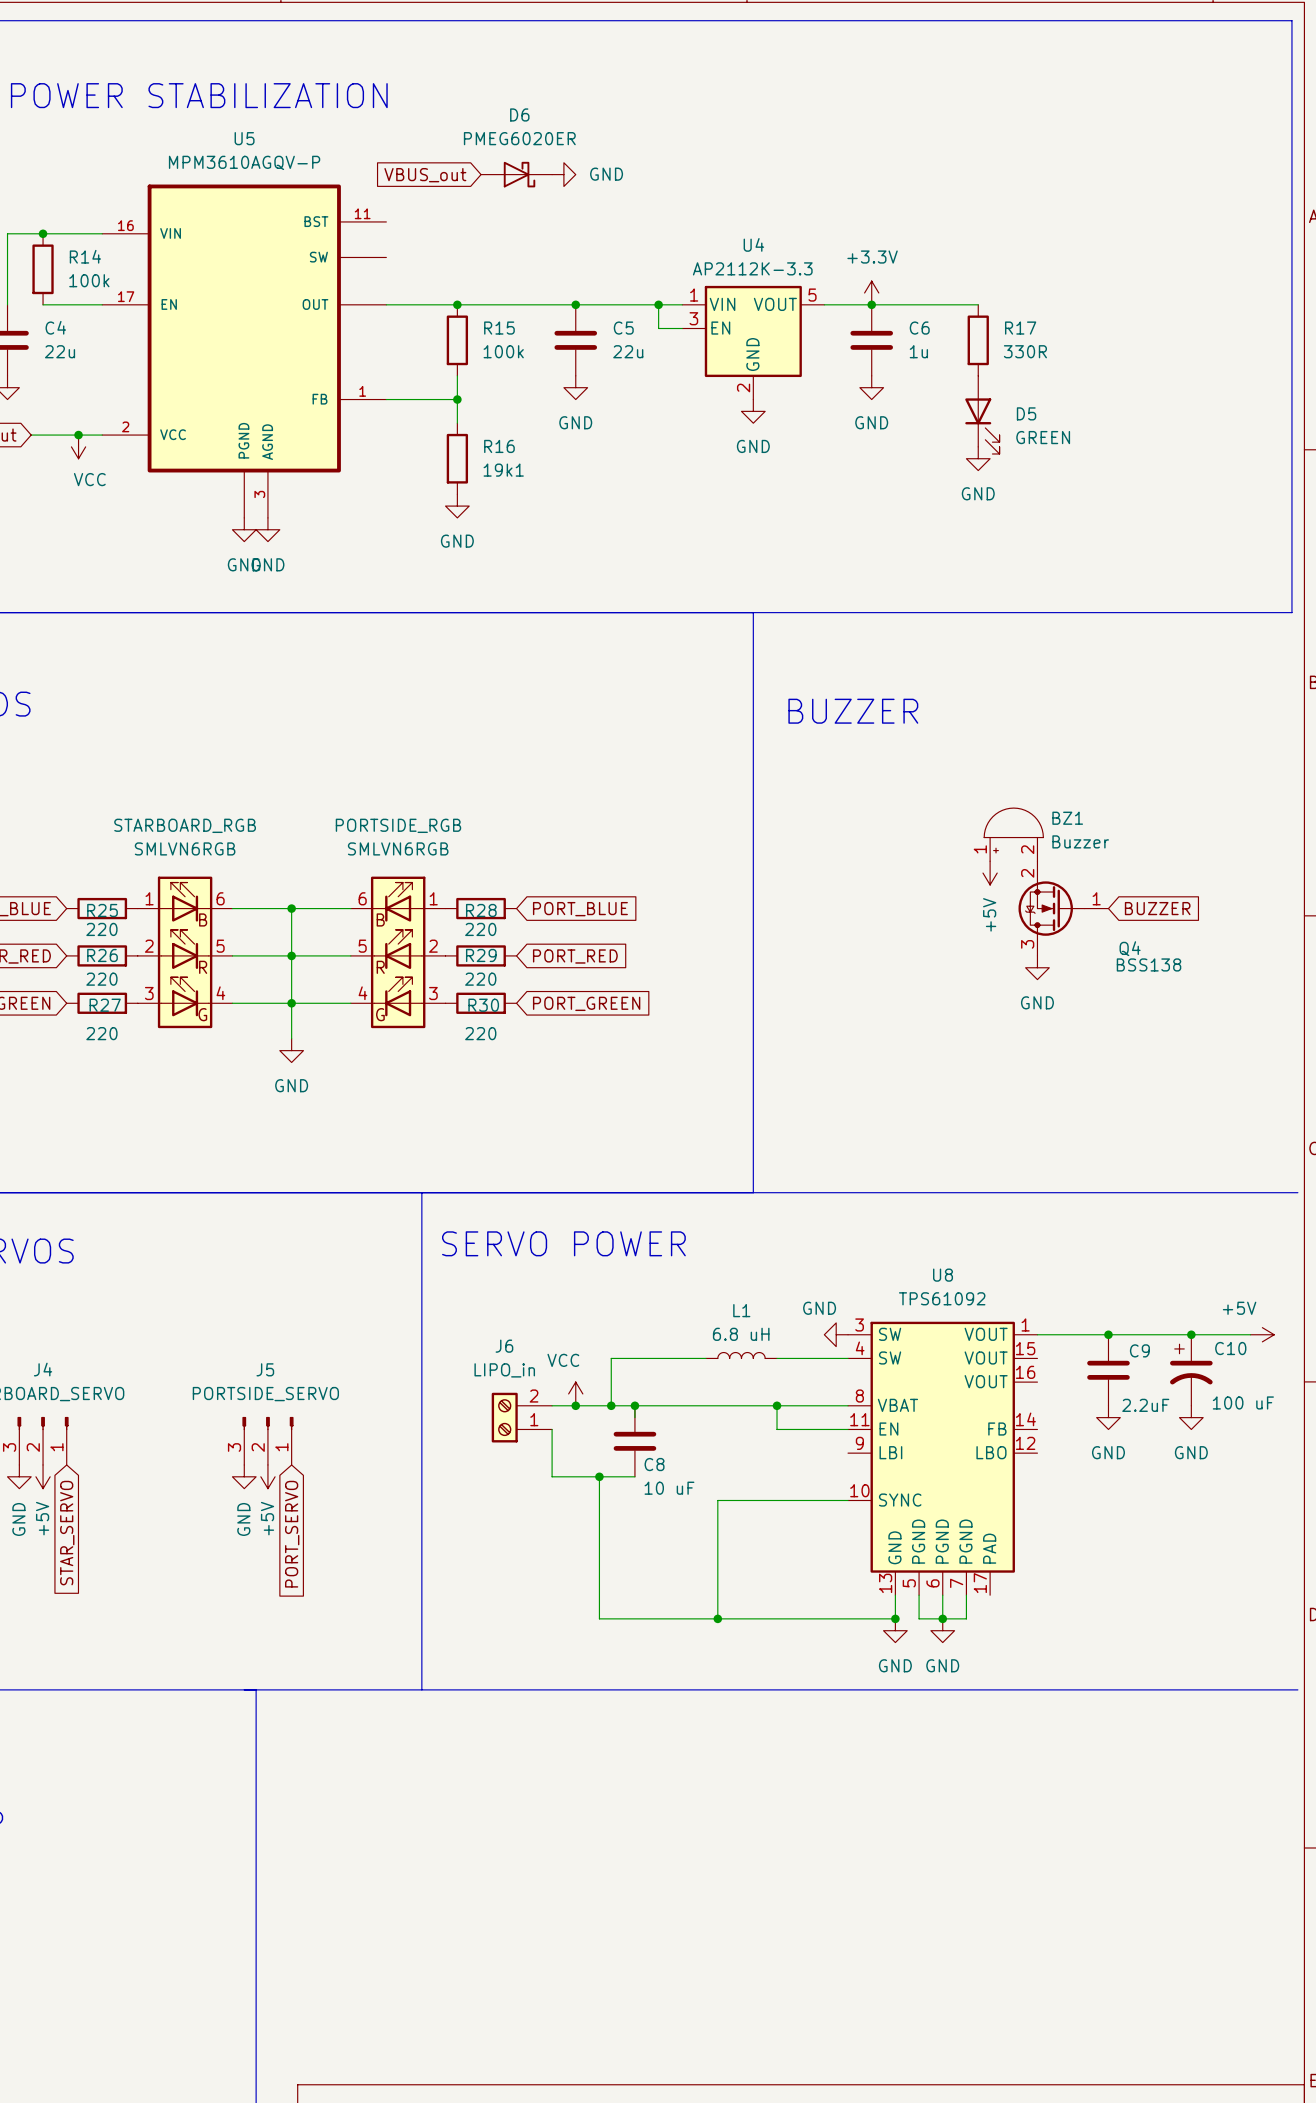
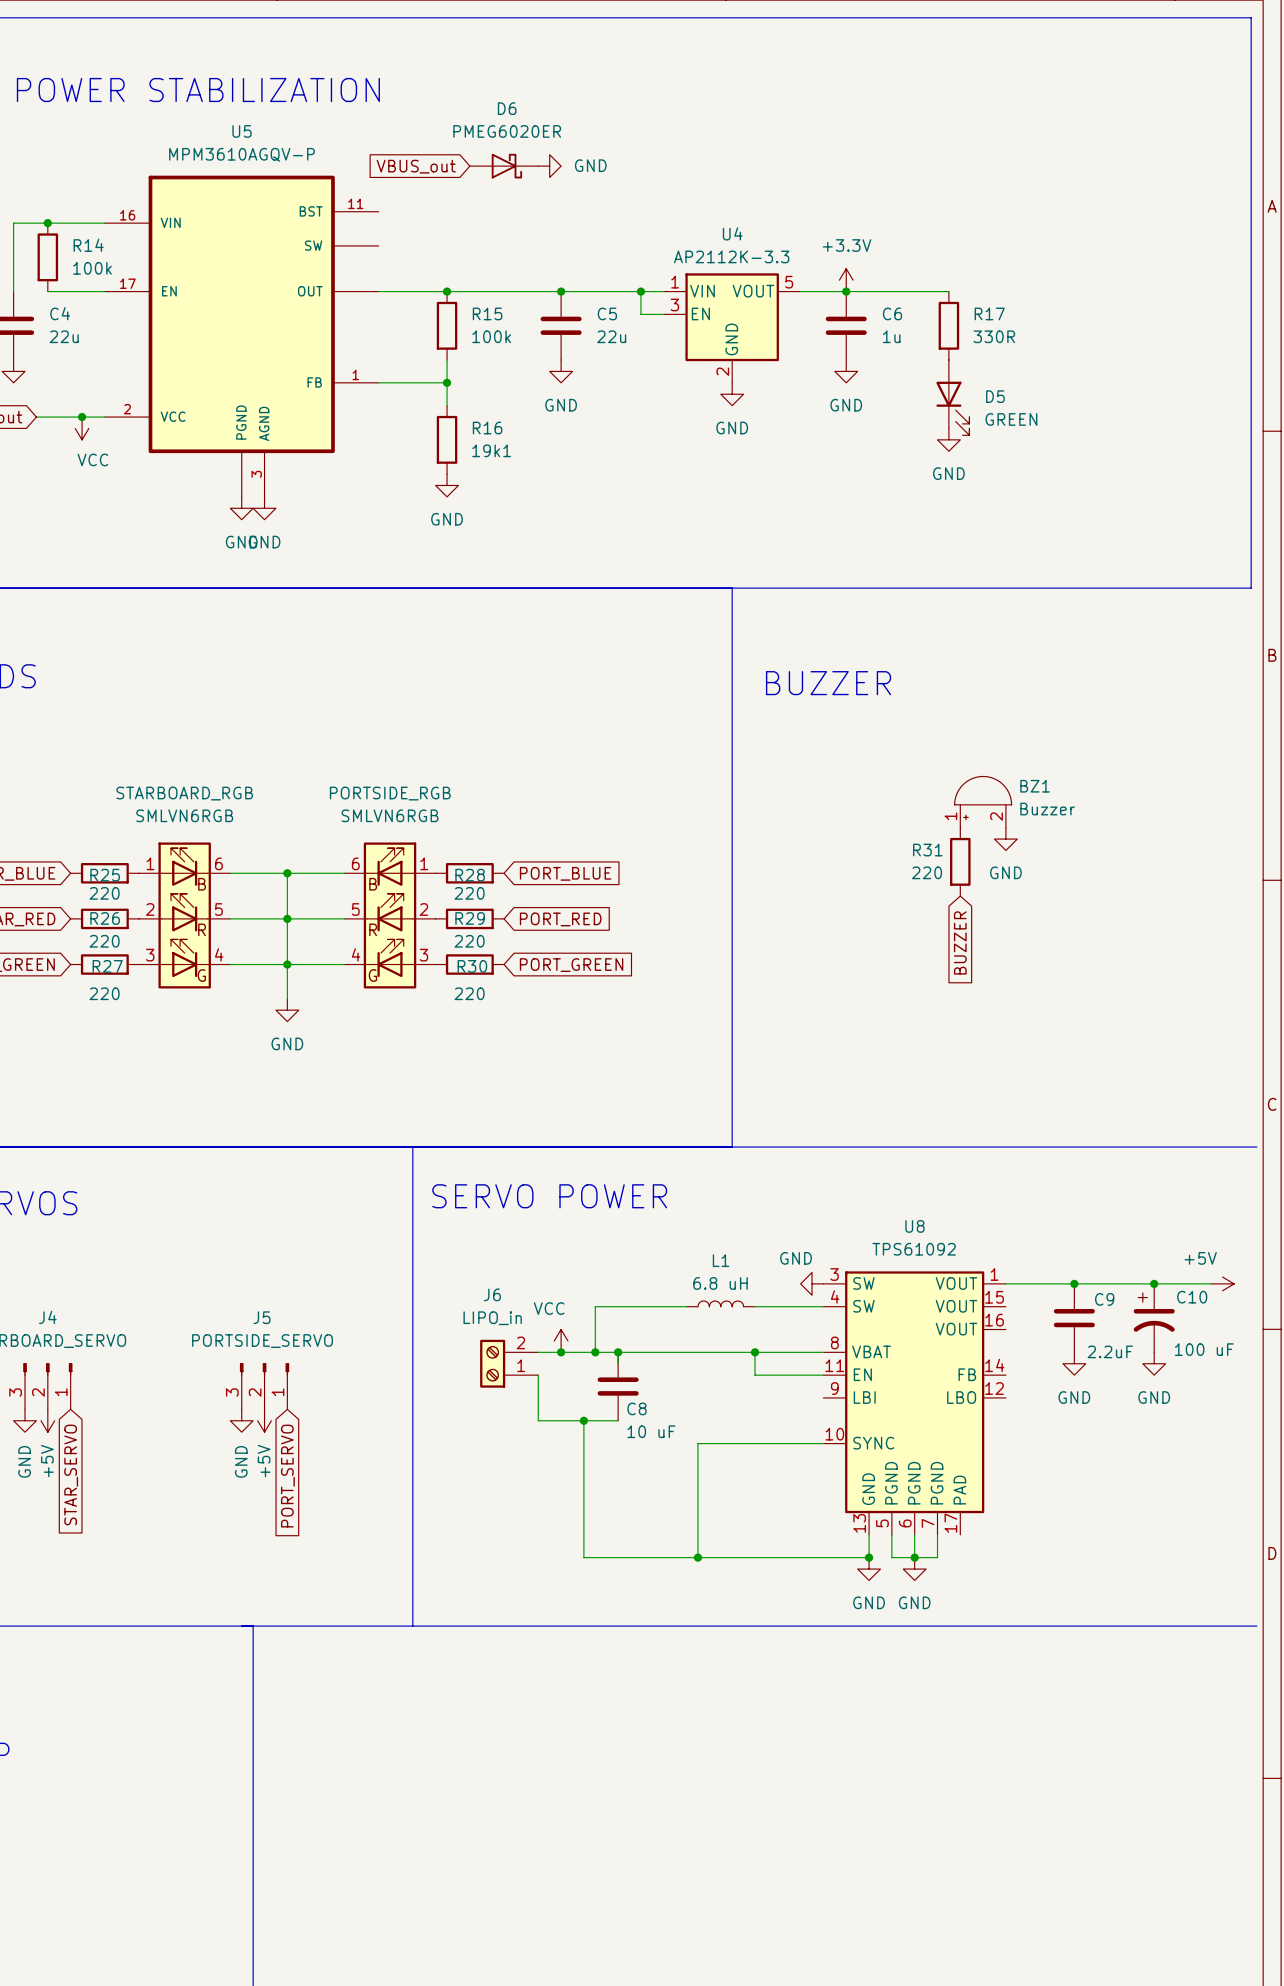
power symbol: +5V (990, 873) -> none
R31: none -> 220 (960, 861)
Q4: BSS138 (1063, 908) -> none
global label rotation: 0° (1157, 908) -> 90° clockwise (960, 942)
global label position: BUZZER (1157, 908) -> BUZZER (960, 942)
power symbol position: GND (1037, 967) -> GND (1005, 839)

